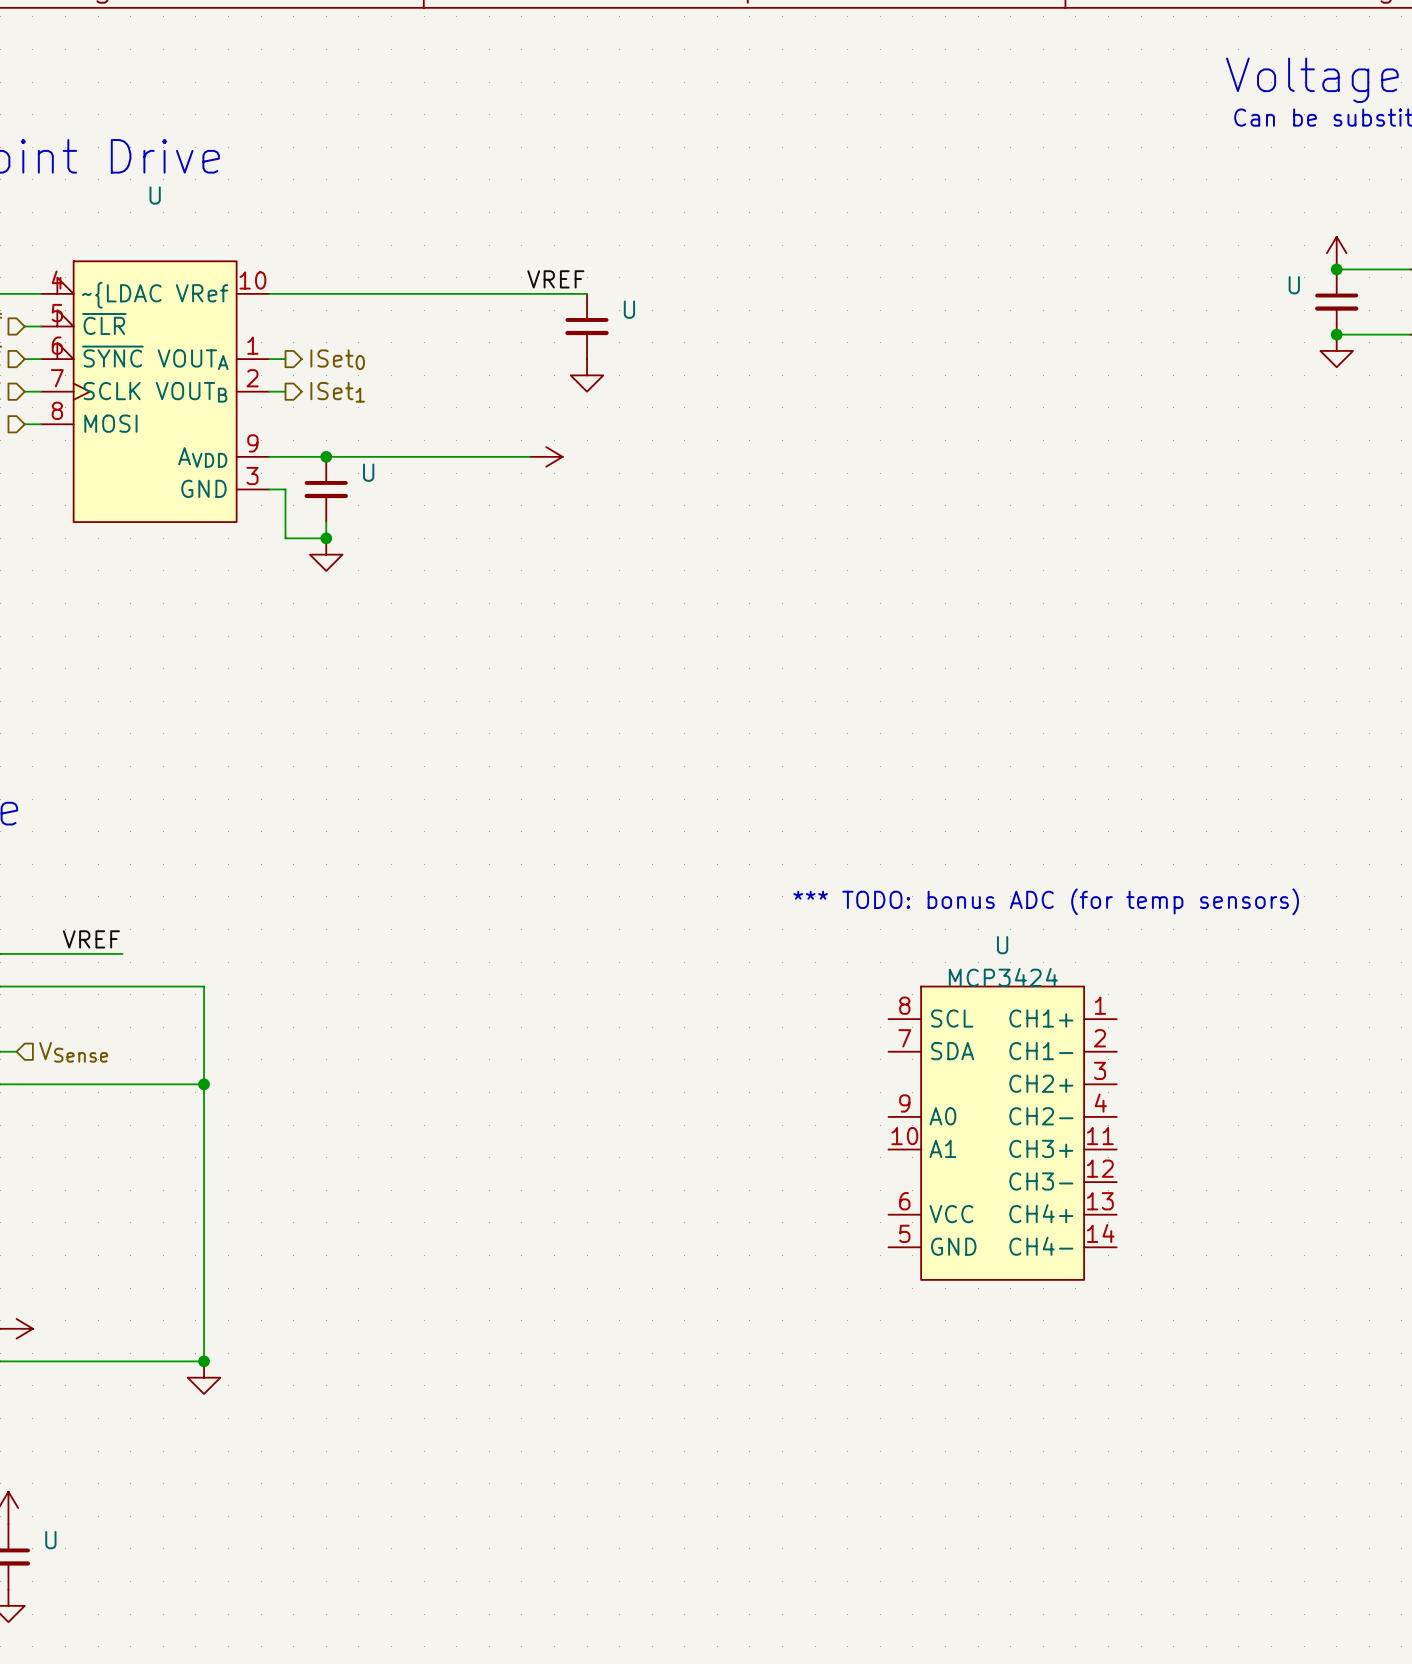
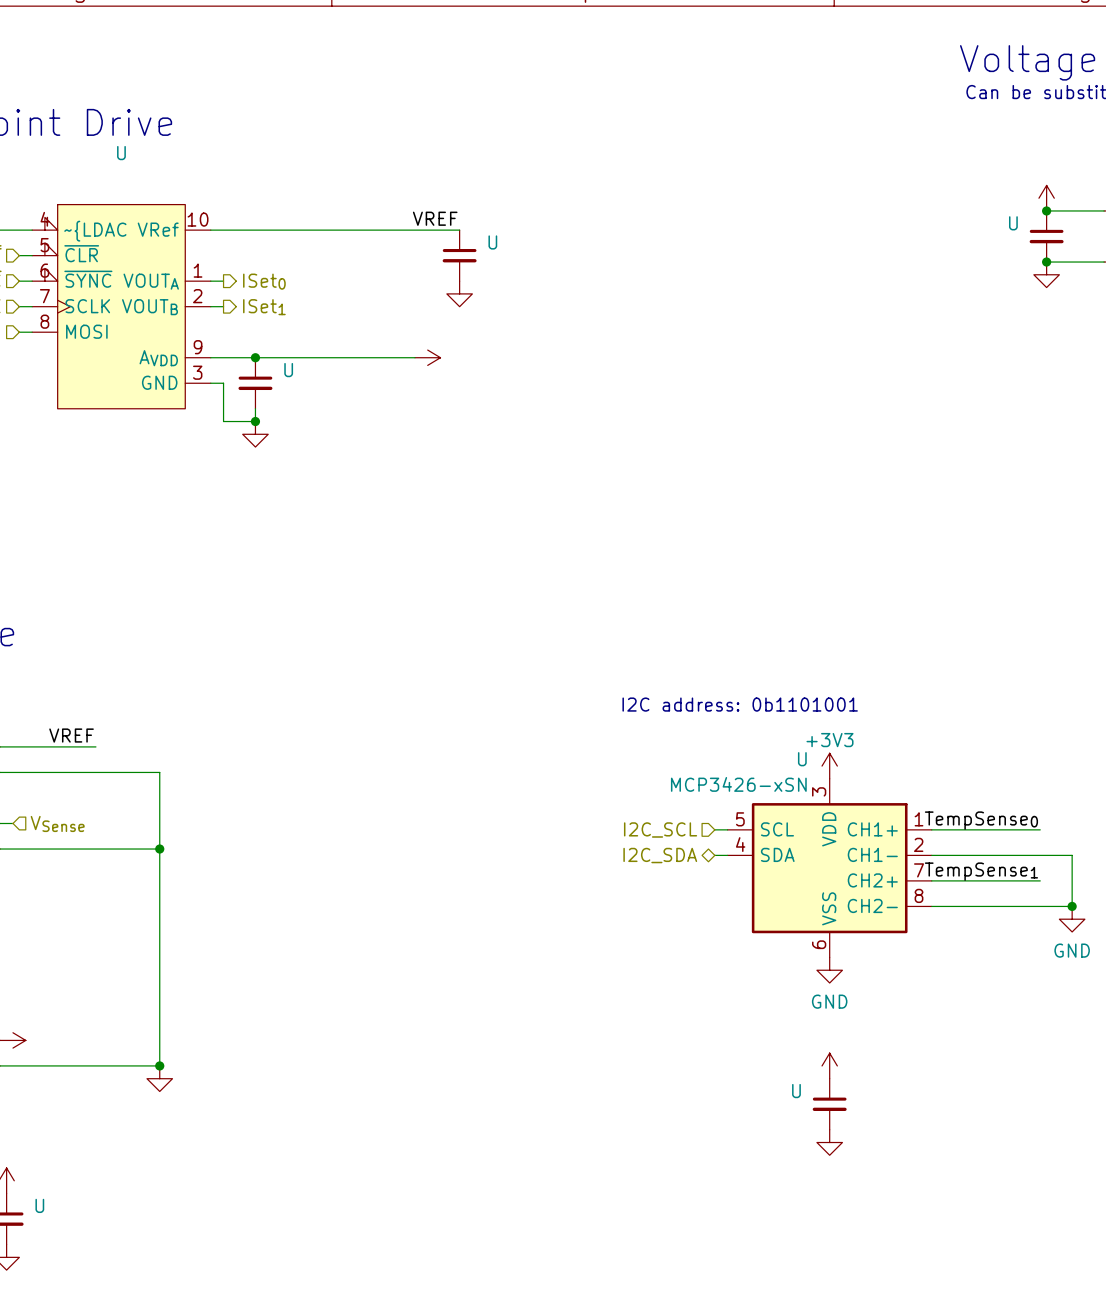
text: *** TODO: bonus ADC (for temp sensors) (1046, 901) -> I2C address: 0b1101001 (740, 704)
power symbol: none -> +3V3 (829, 766)
label: none -> TempSense0 (981, 820)
wire: none -> (931, 829) (1040, 829)
hierarchical label: none -> I2C_SCL (660, 830)
hierarchical label: none -> I2C_SDA (660, 855)
wire: none -> (931, 855) (1072, 855) (1072, 906) (931, 906)
U: none -> MCP3426-xSN (829, 868)
label: none -> TempSense1 (981, 871)
wire: none -> (931, 880) (1040, 880)
U: MCP3424 (1002, 1133) -> none
junction: none -> (1072, 906)
power symbol: none -> GND (1072, 919)
power symbol: none -> GND (829, 970)
power symbol: none -> (829, 1065)
U: none -> (829, 1104)
power symbol: none -> (829, 1142)

